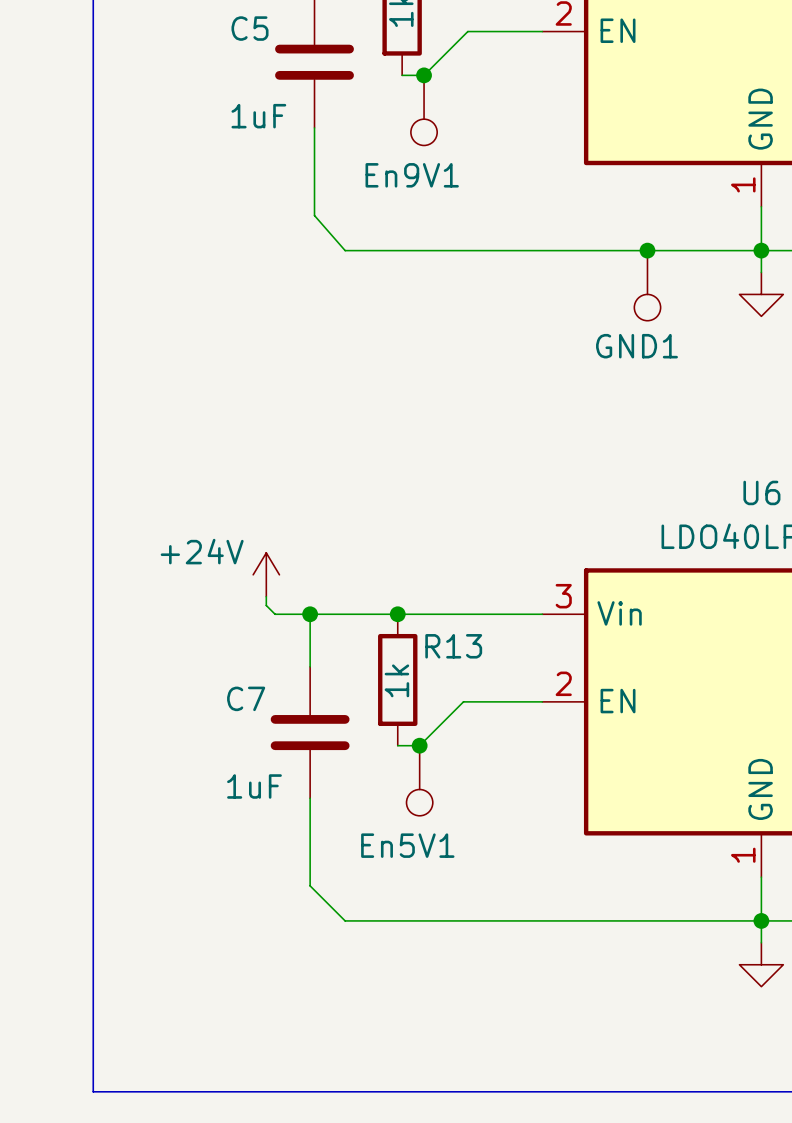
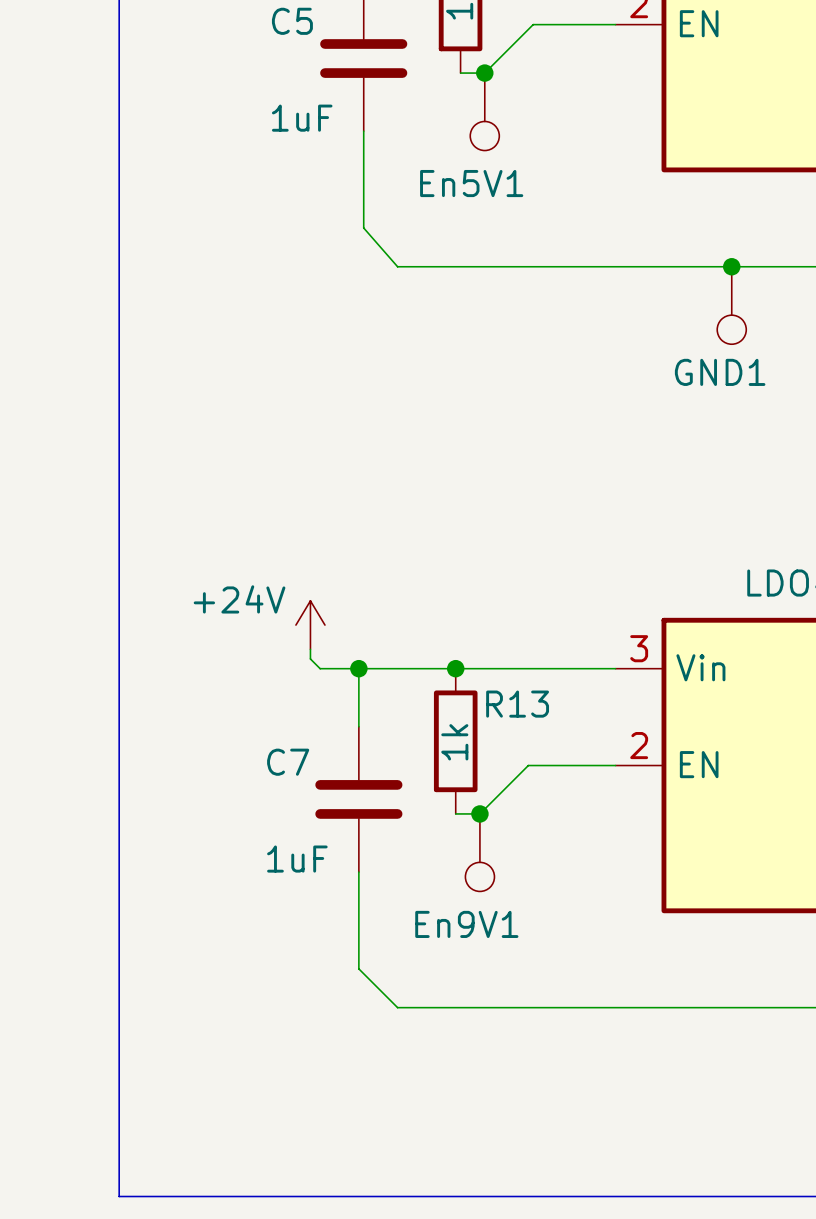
En9V1 name: En9V1 (412, 175) -> En5V1 (471, 183)
En5V1 name: En5V1 (407, 845) -> En9V1 (466, 924)

